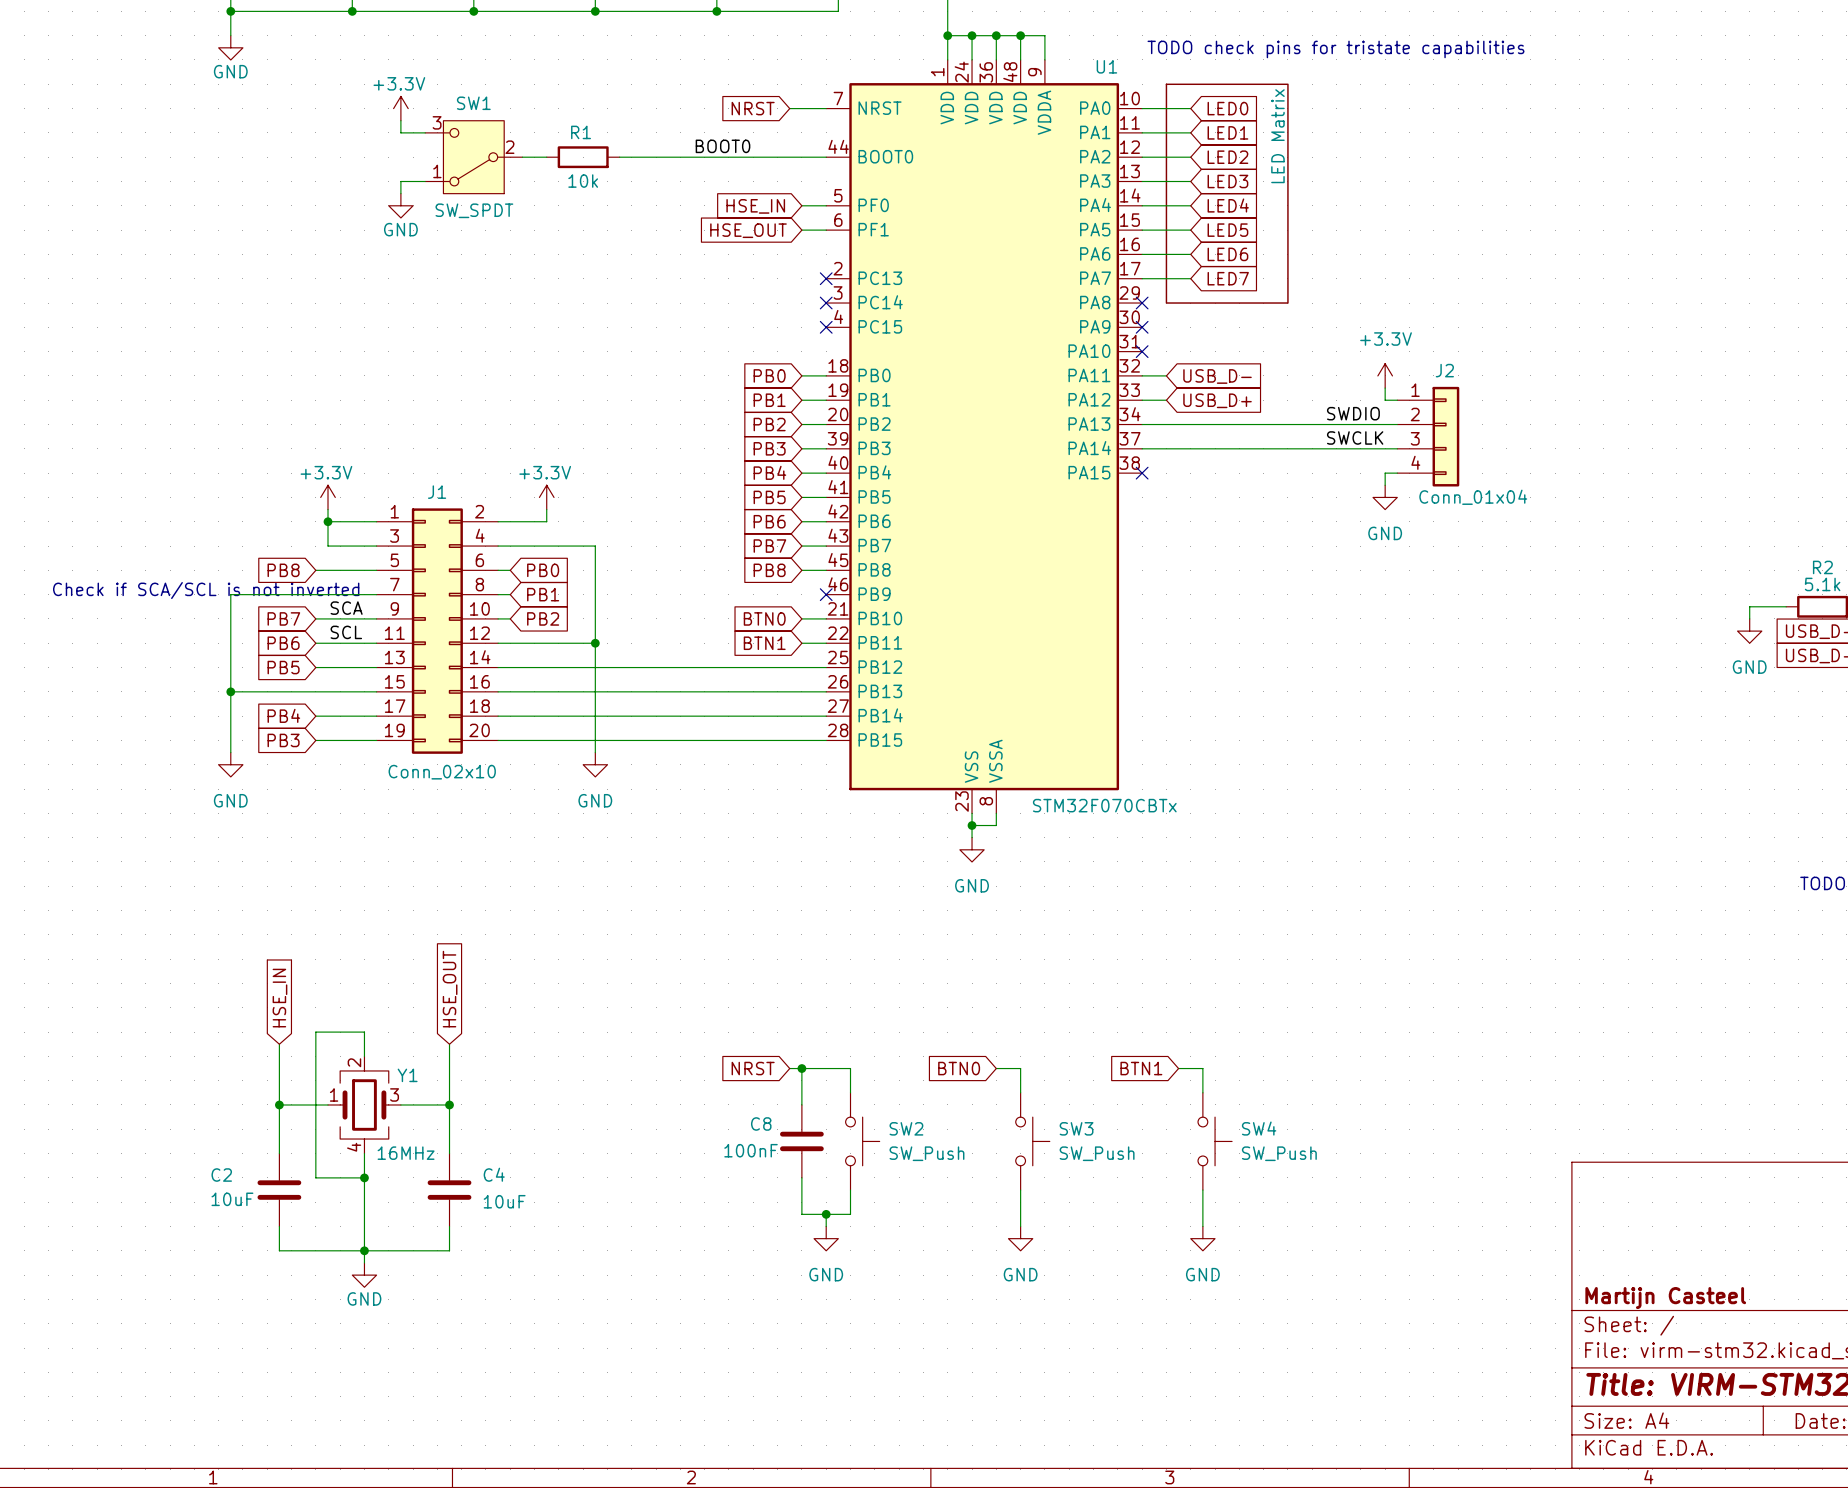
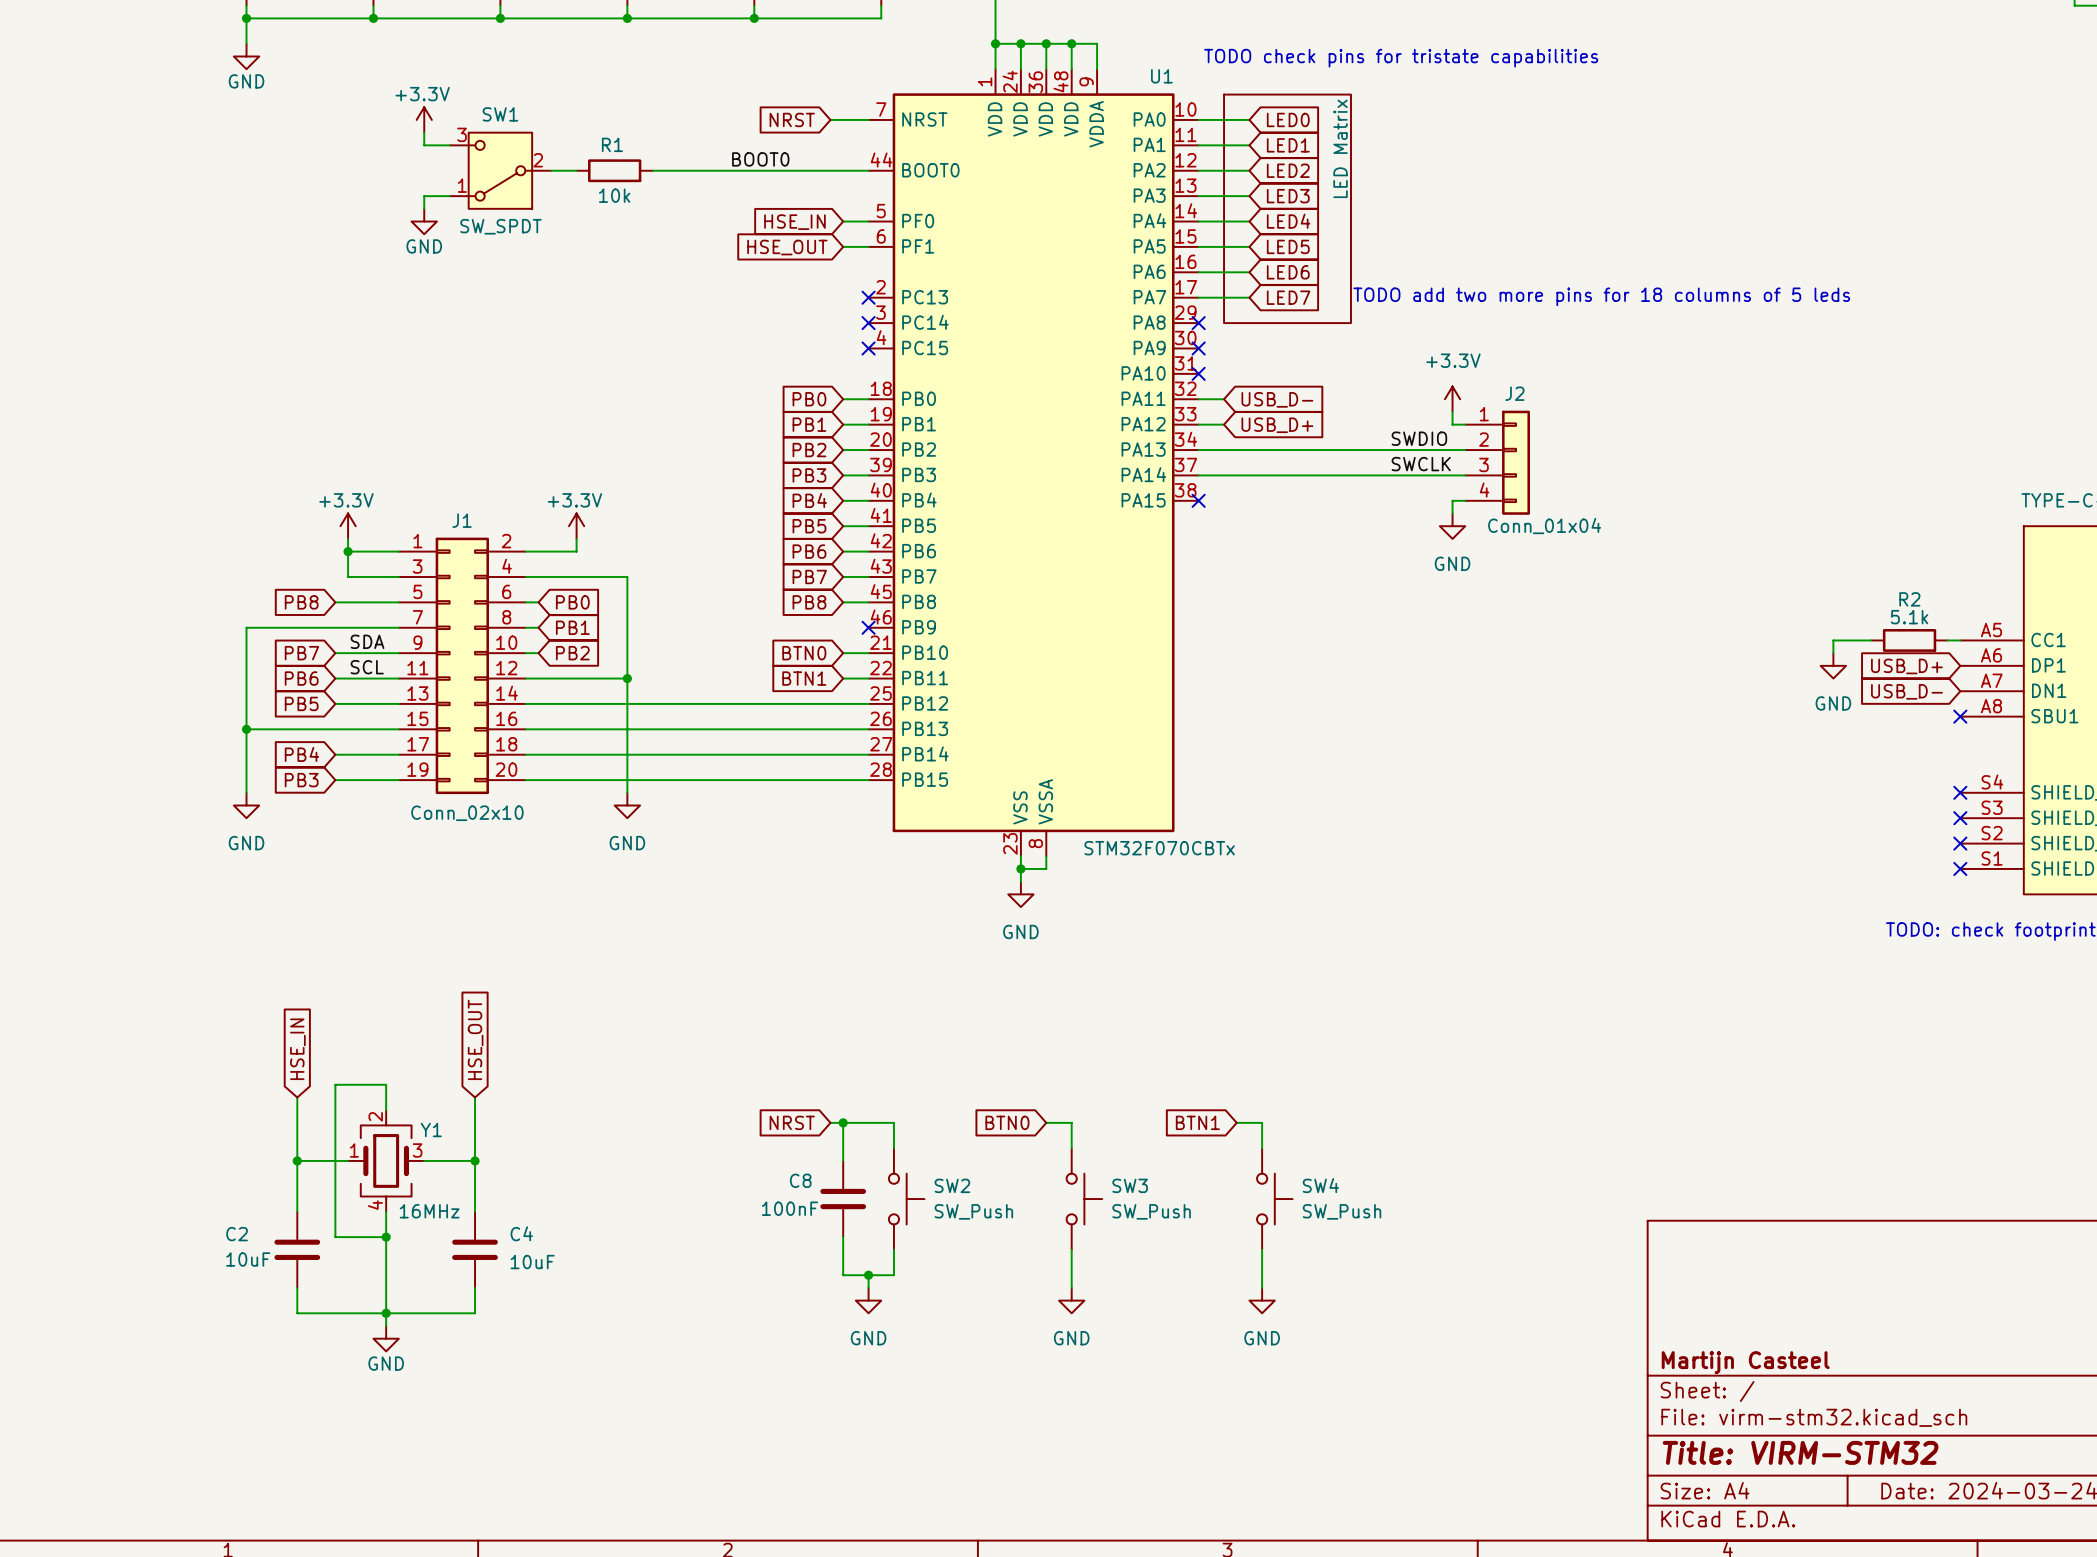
text: none -> TODO add two more pins for 18 columns of 5 leds (1601, 296)
text: Check if SCA/SCL is not inverted (206, 590) -> none
label: SCA (346, 608) -> SDA (367, 641)

